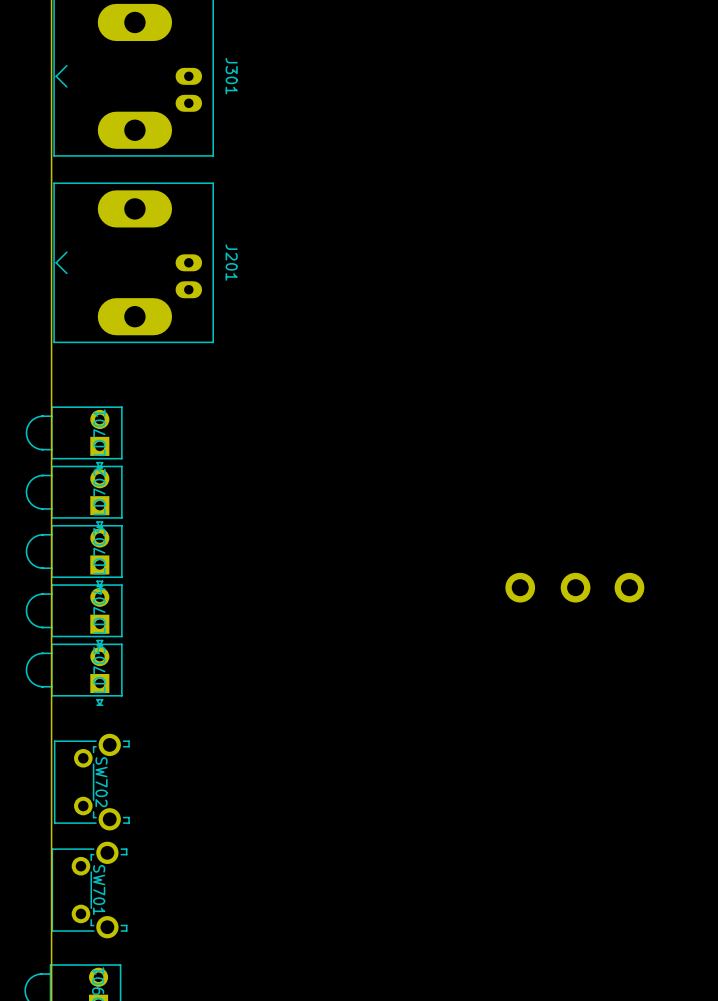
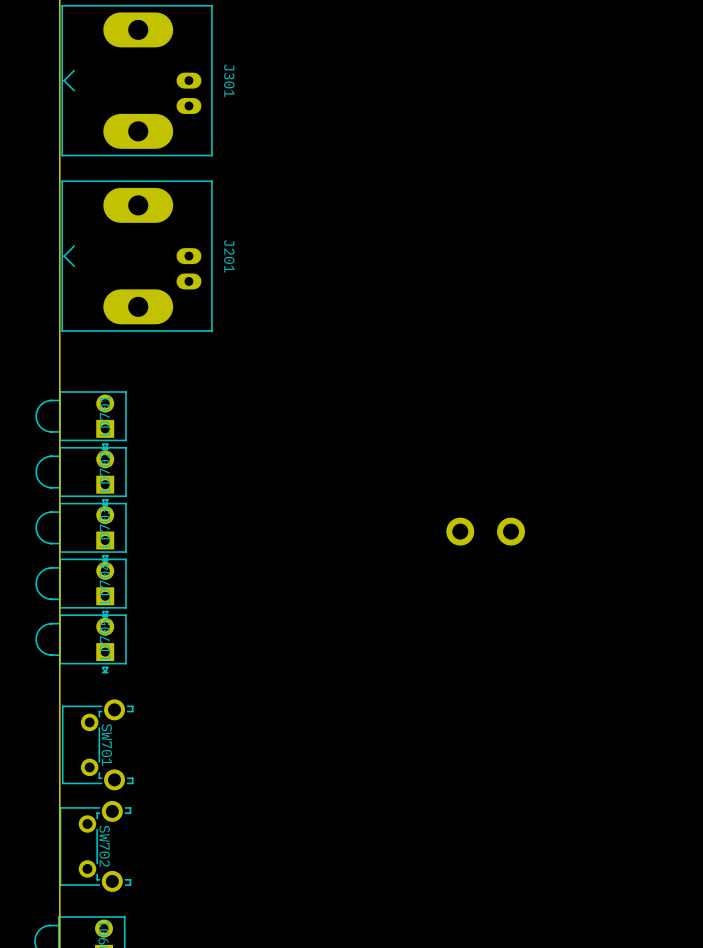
part: none -> (460, 531)
part: none -> (511, 531)
part: (520, 587) -> none
part: (575, 587) -> none
part: (629, 587) -> none
SW702 name: SW702 (101, 782) -> SW701 (106, 744)
SW701 name: SW701 (99, 890) -> SW702 (104, 846)

